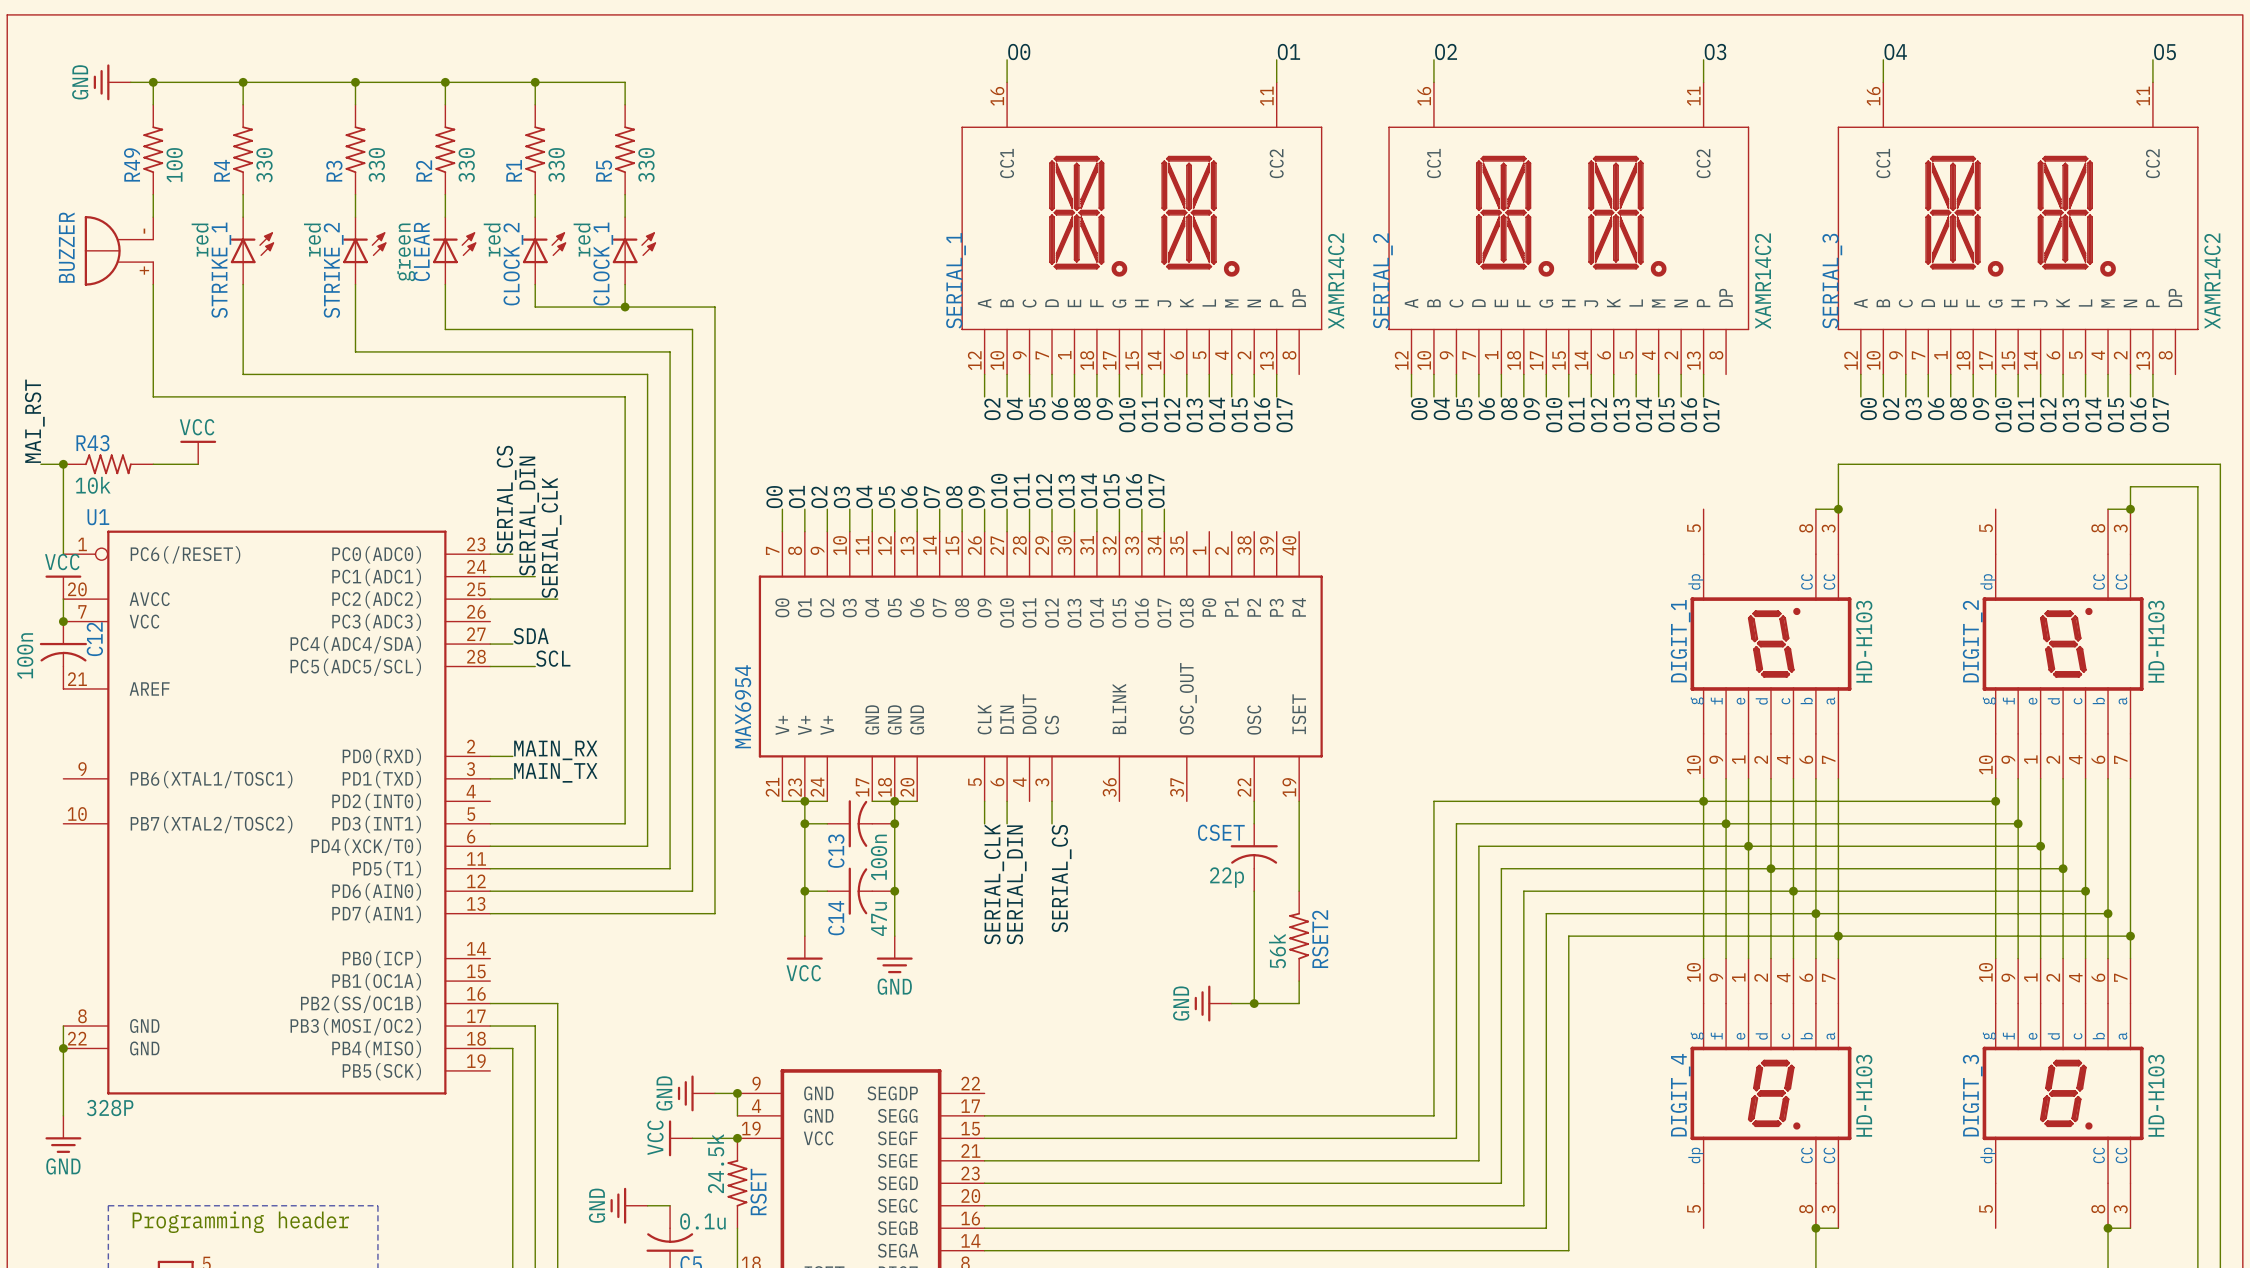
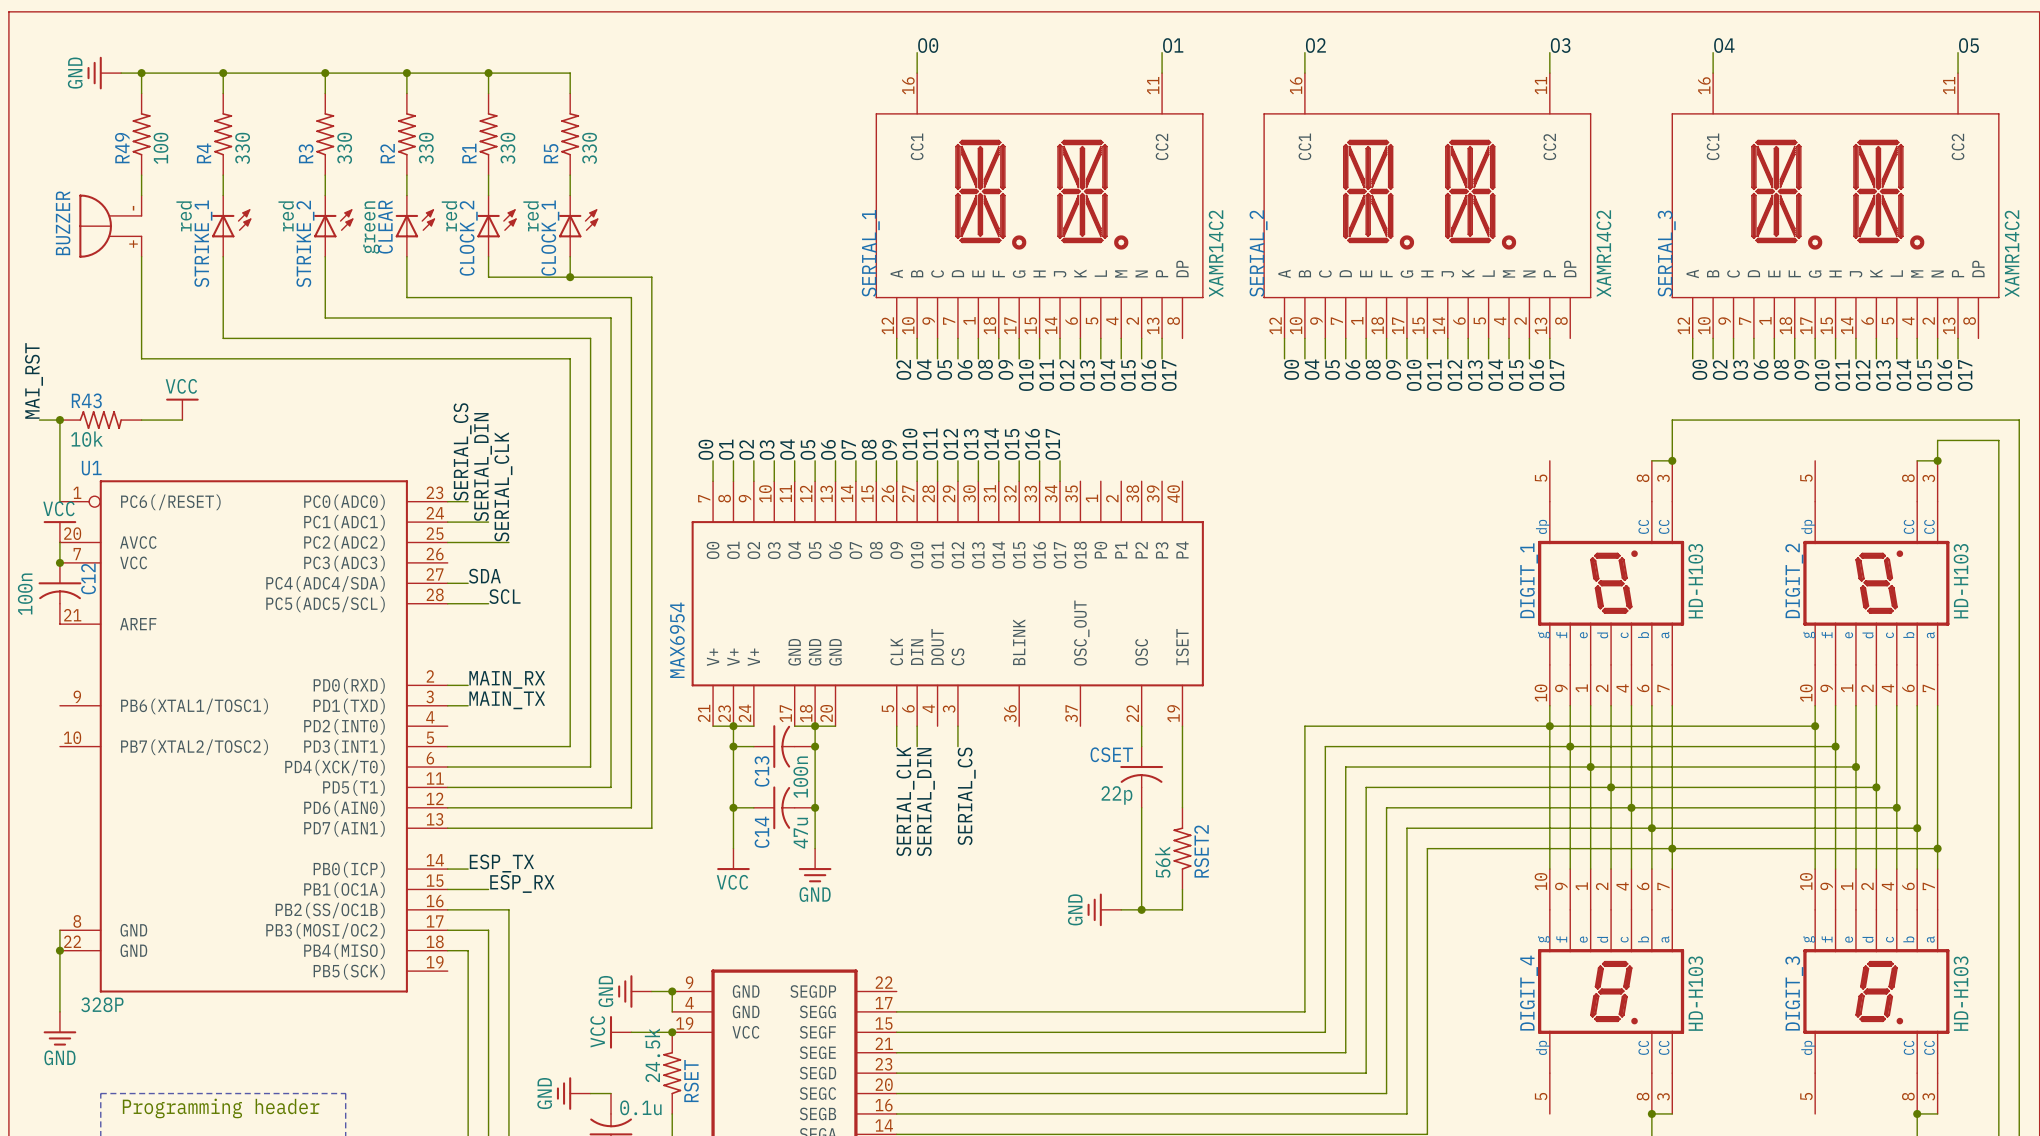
label: none -> ESP_TX (501, 863)
wire: none -> (447, 869) (468, 869)
label: none -> ESP_RX (522, 883)
wire: none -> (447, 889) (488, 889)

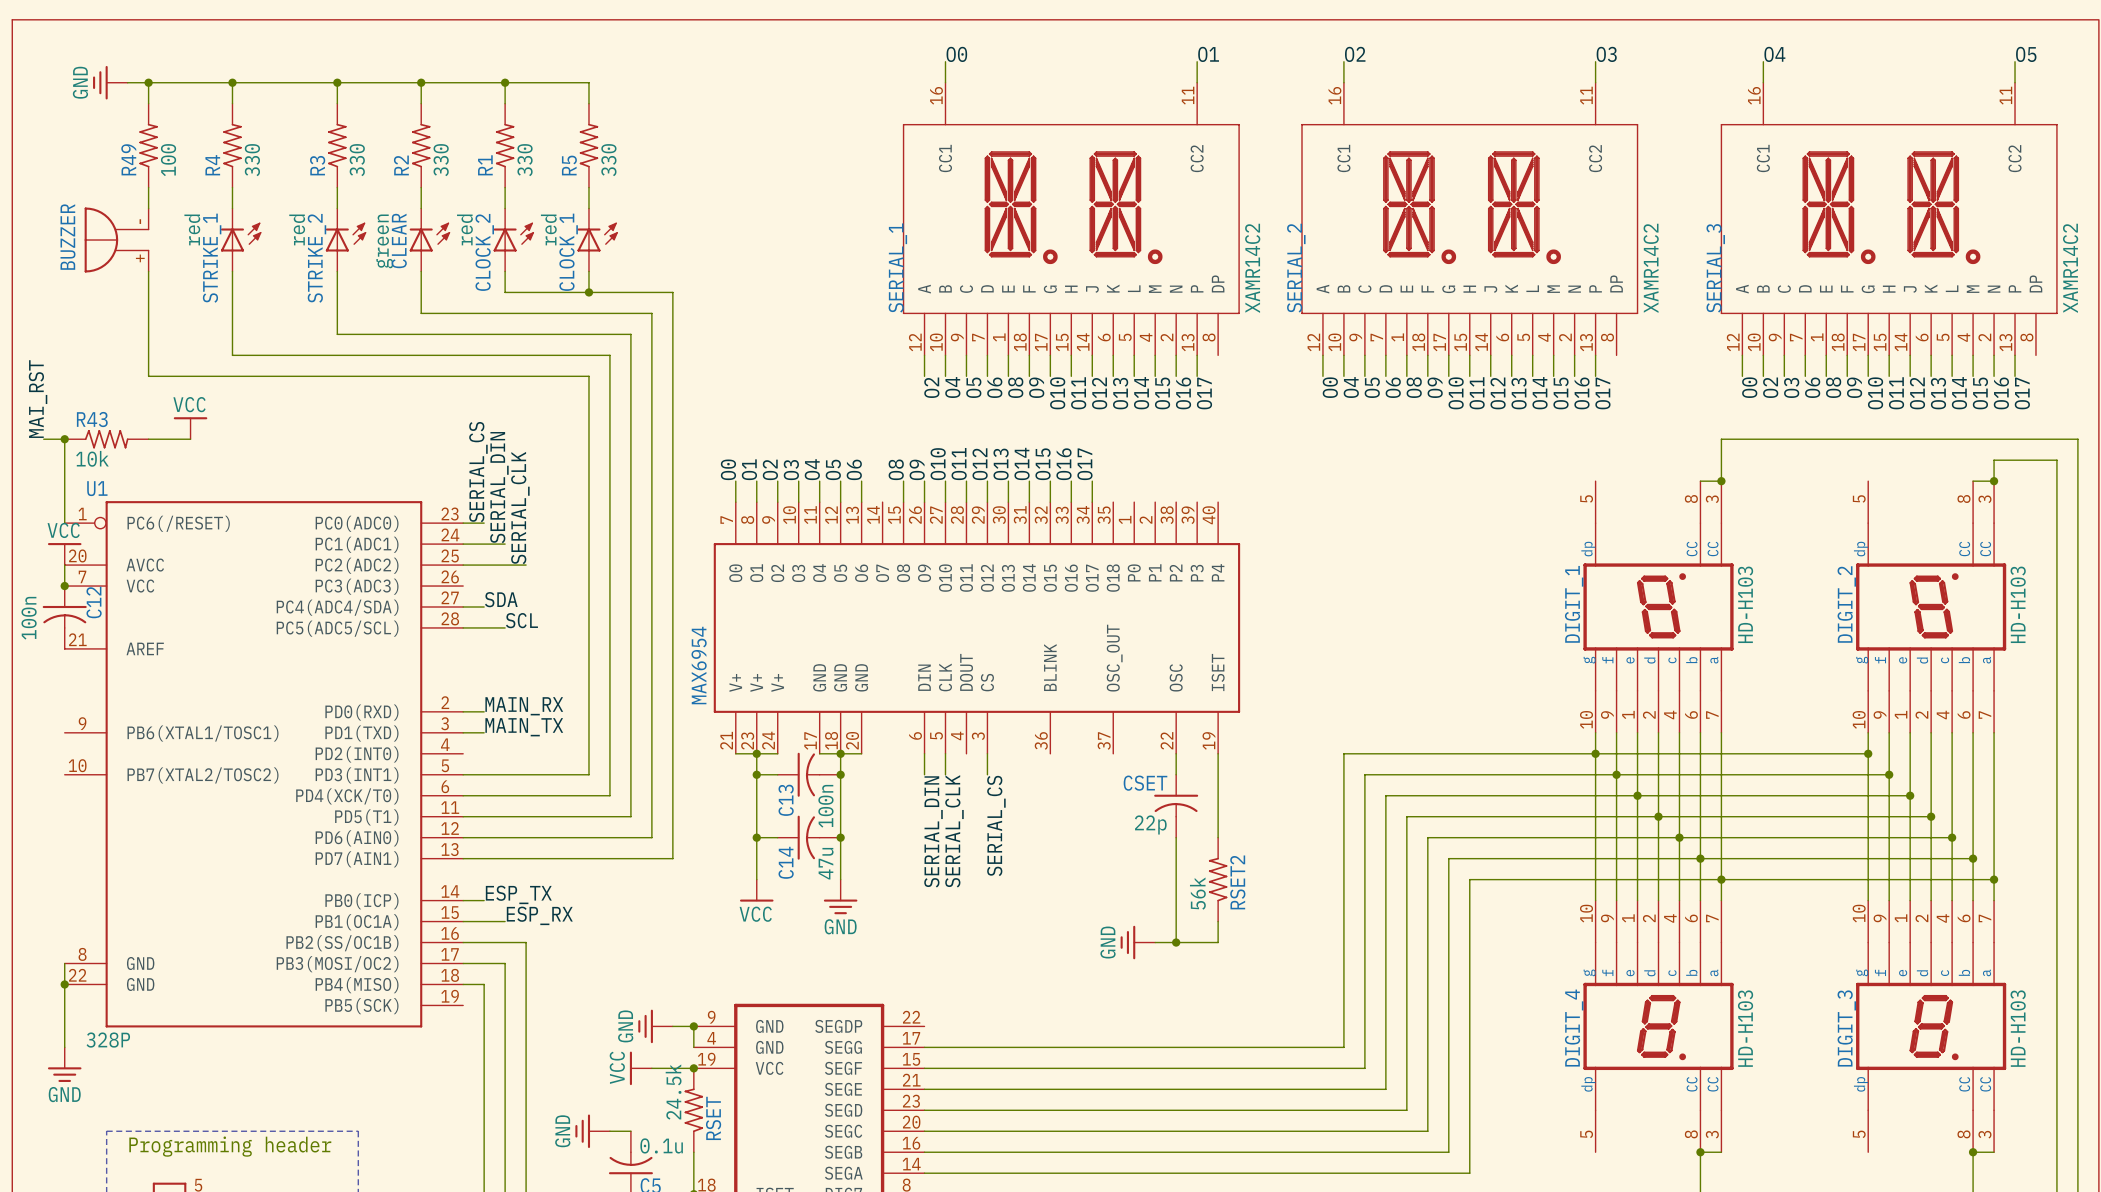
label: O7 (848, 449) -> none
wire: (855, 460) (855, 481) -> none
MAX6954 pin name: CLK (896, 651) -> DIN (924, 677)
MAX6954 pin name: DIN (917, 652) -> CLK (945, 677)
MAX6954 pin number: 5 (888, 708) -> 6 (915, 735)
MAX6954 pin number: 6 (908, 708) -> 5 (936, 735)
label: SERIAL_CLK (905, 801) -> SERIAL_DIN (933, 831)
label: SERIAL_DIN (925, 802) -> SERIAL_CLK (954, 831)

